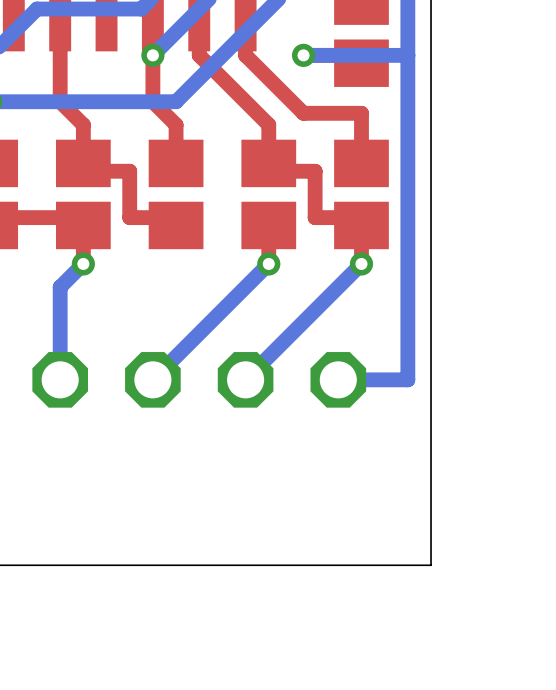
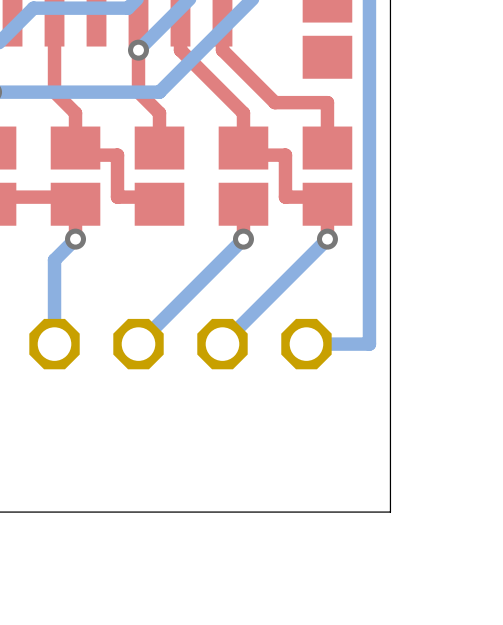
via: (303, 55) -> none
bottom track: (407, 55) (303, 55) -> none

